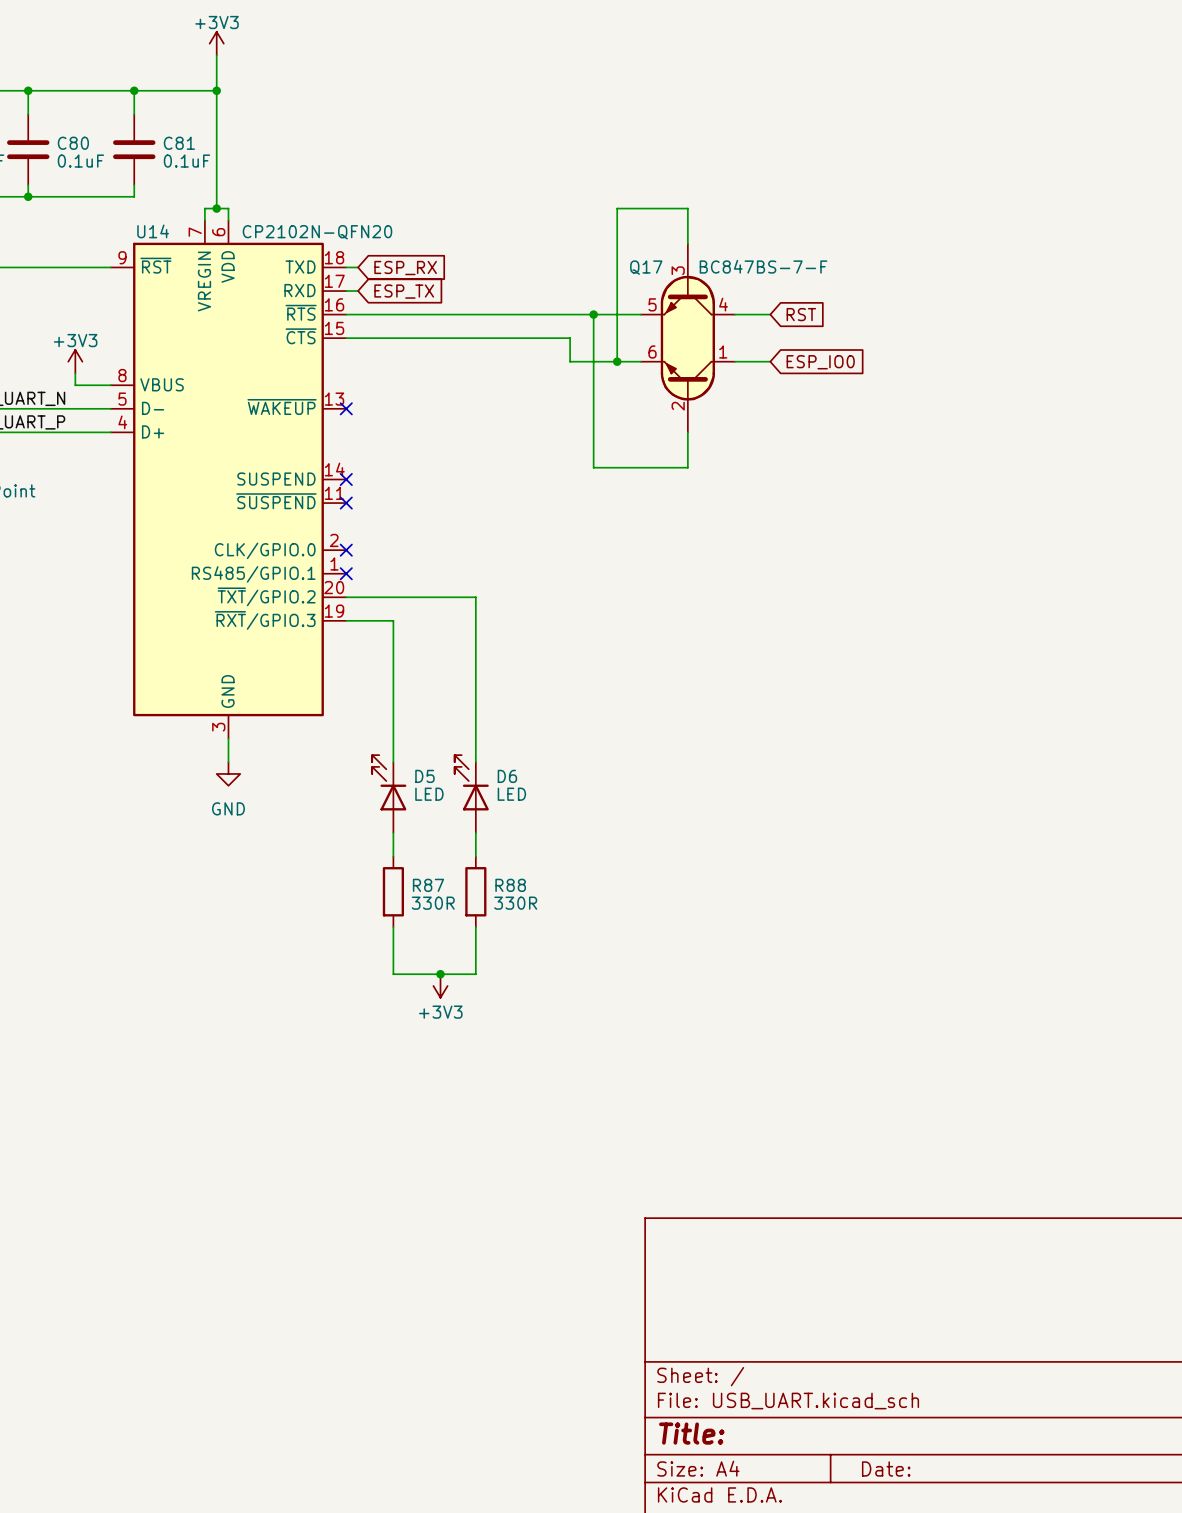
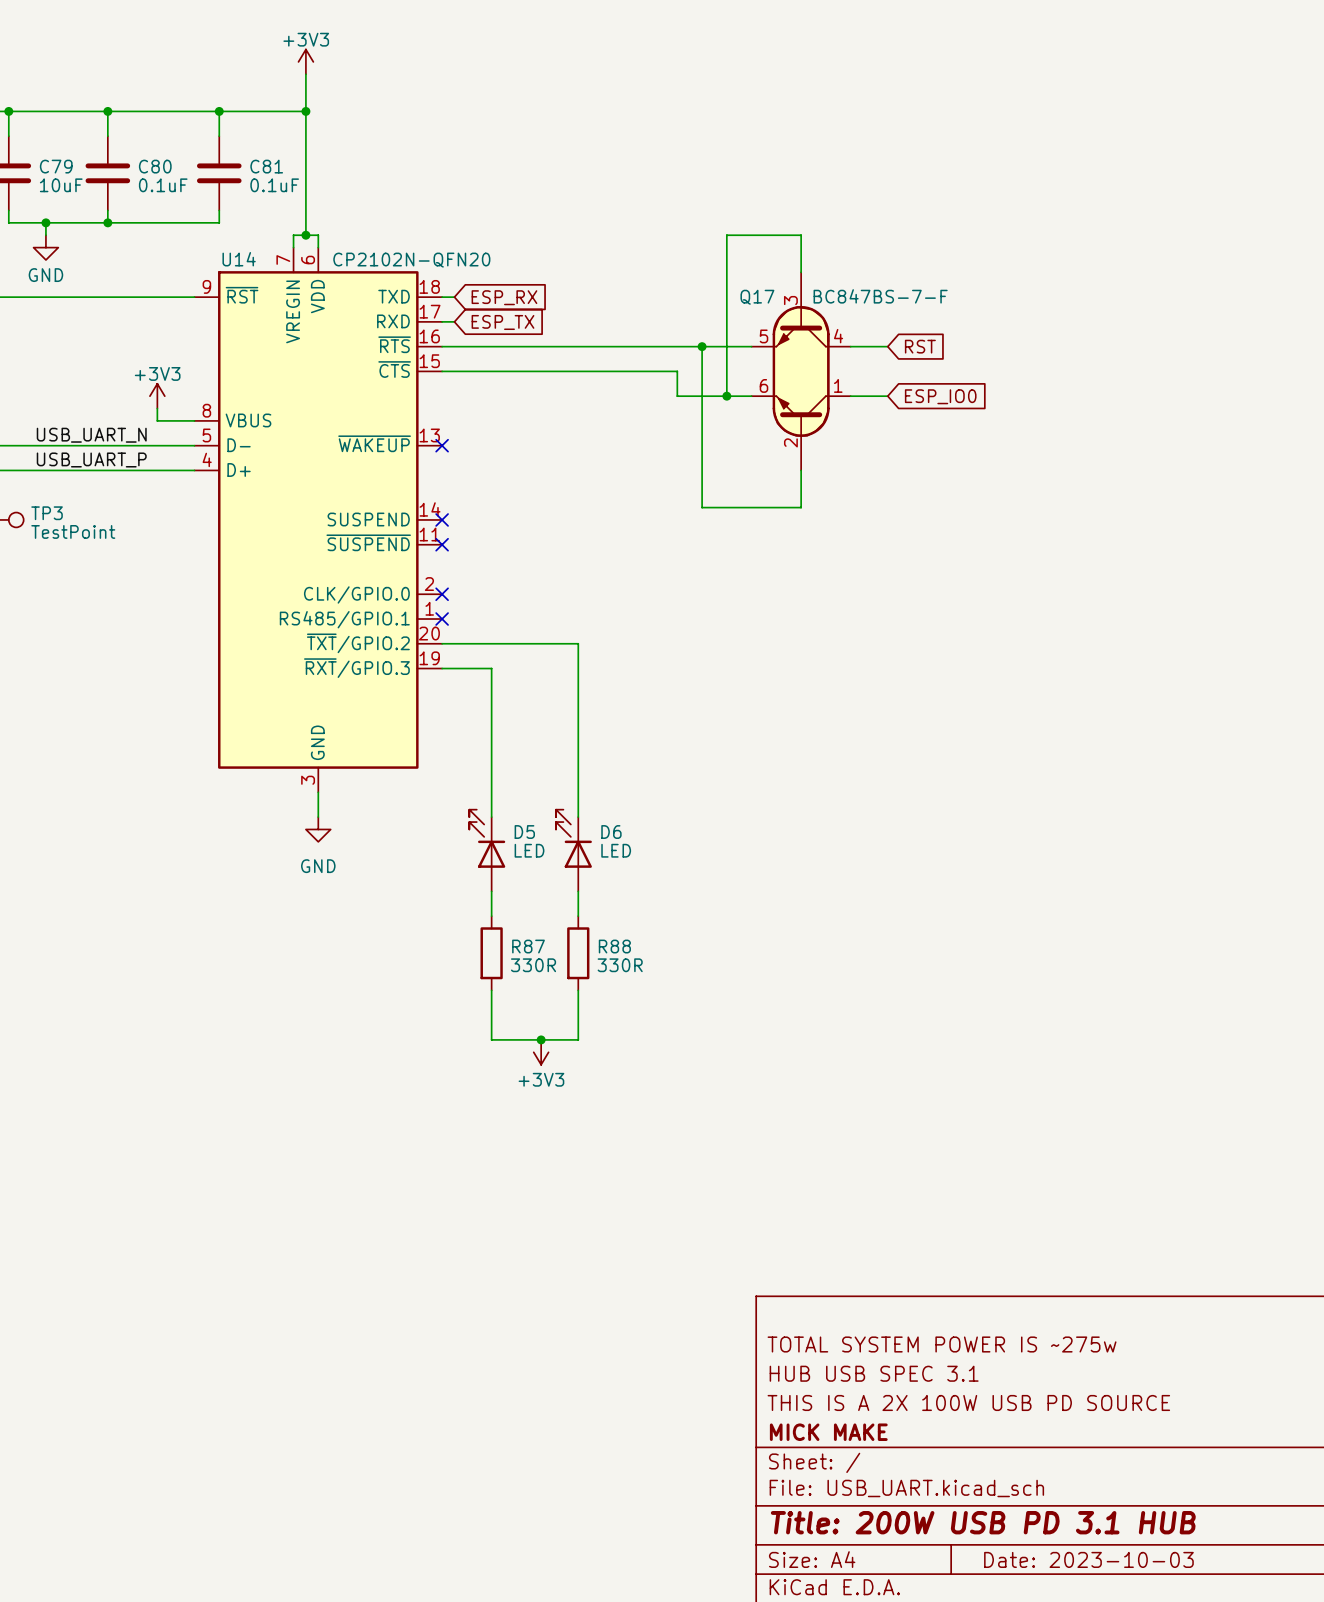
title block: none -> TOTAL SYSTEM POWER IS ~275w (942, 1344)
title block: none -> HUB USB SPEC 3.1 (874, 1373)
title block: none -> THIS IS A 2X 100W USB PD SOURCE (968, 1402)
title block: none -> MICK MAKE (828, 1432)
title block: Title: (691, 1433) -> Title: 200W USB PD 3.1 HUB (983, 1522)
title block: Date: (886, 1468) -> Date: 2023-10-03 (1088, 1559)

